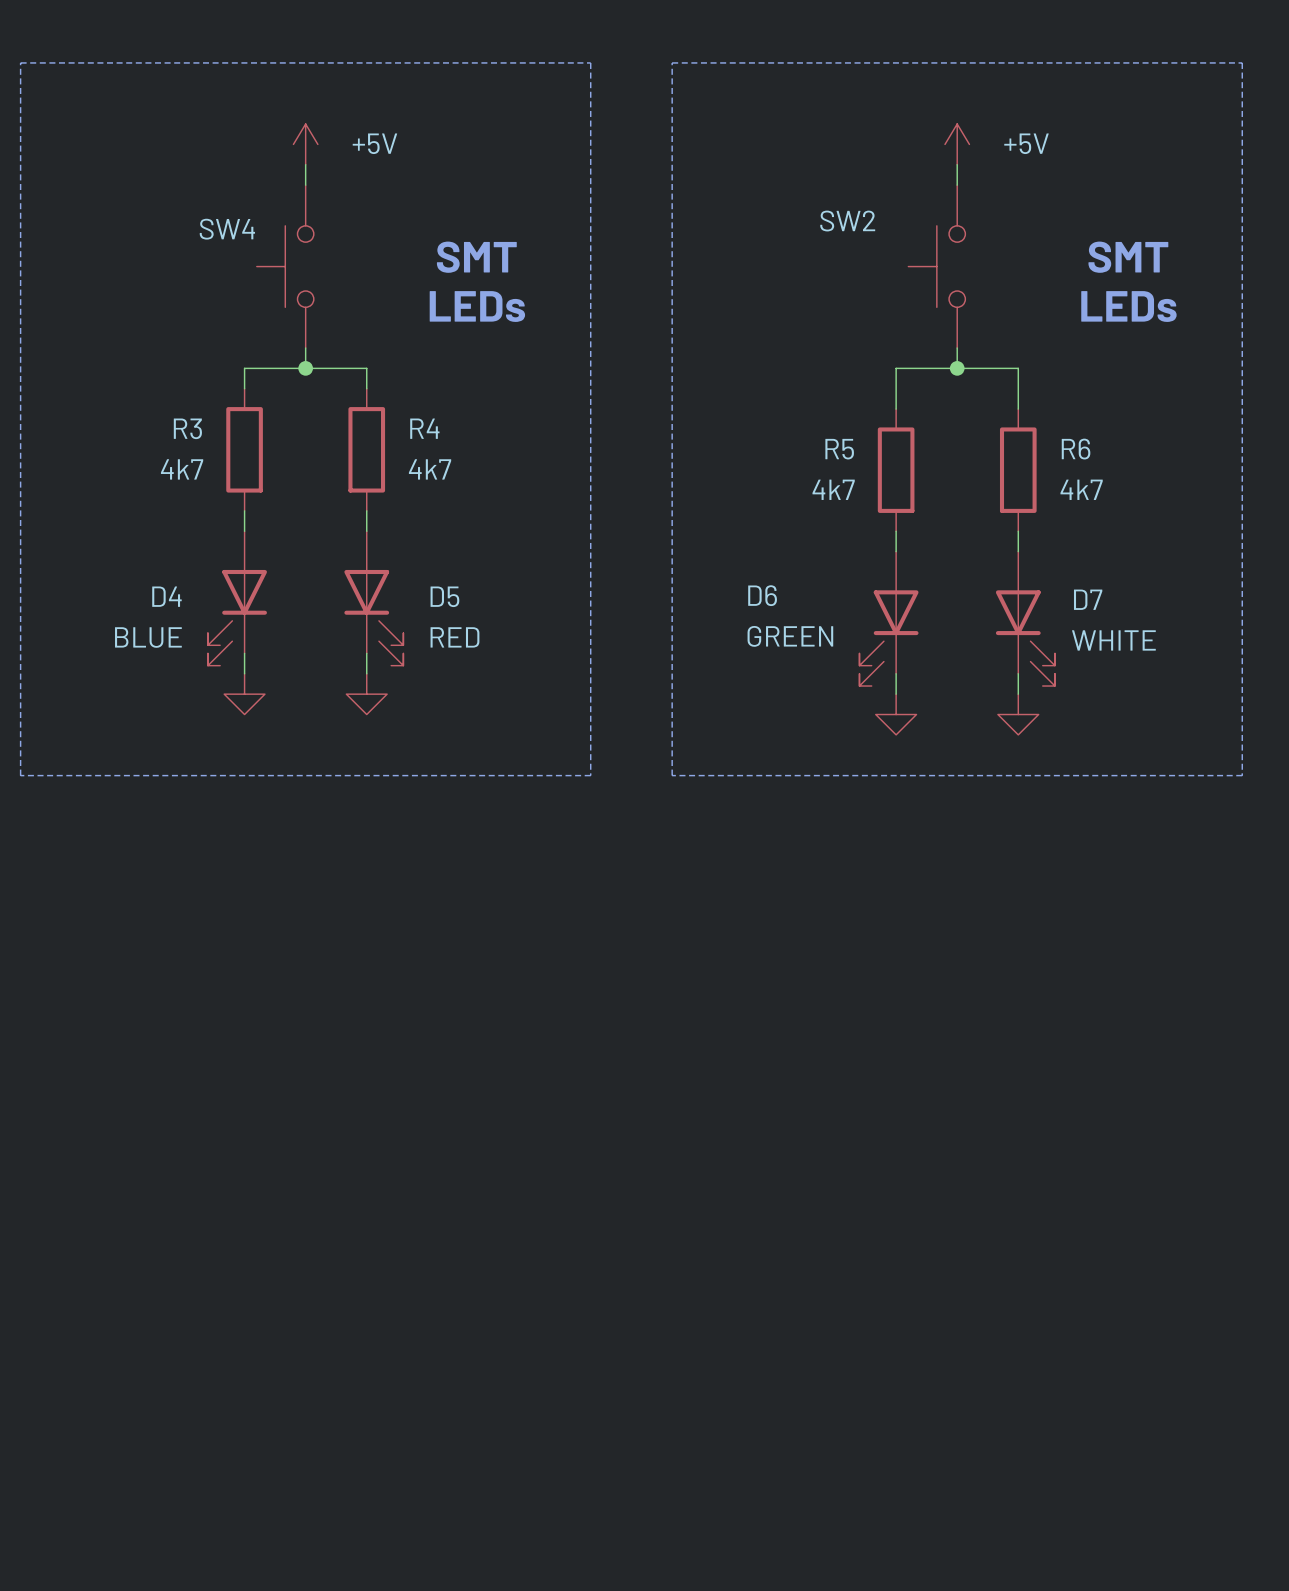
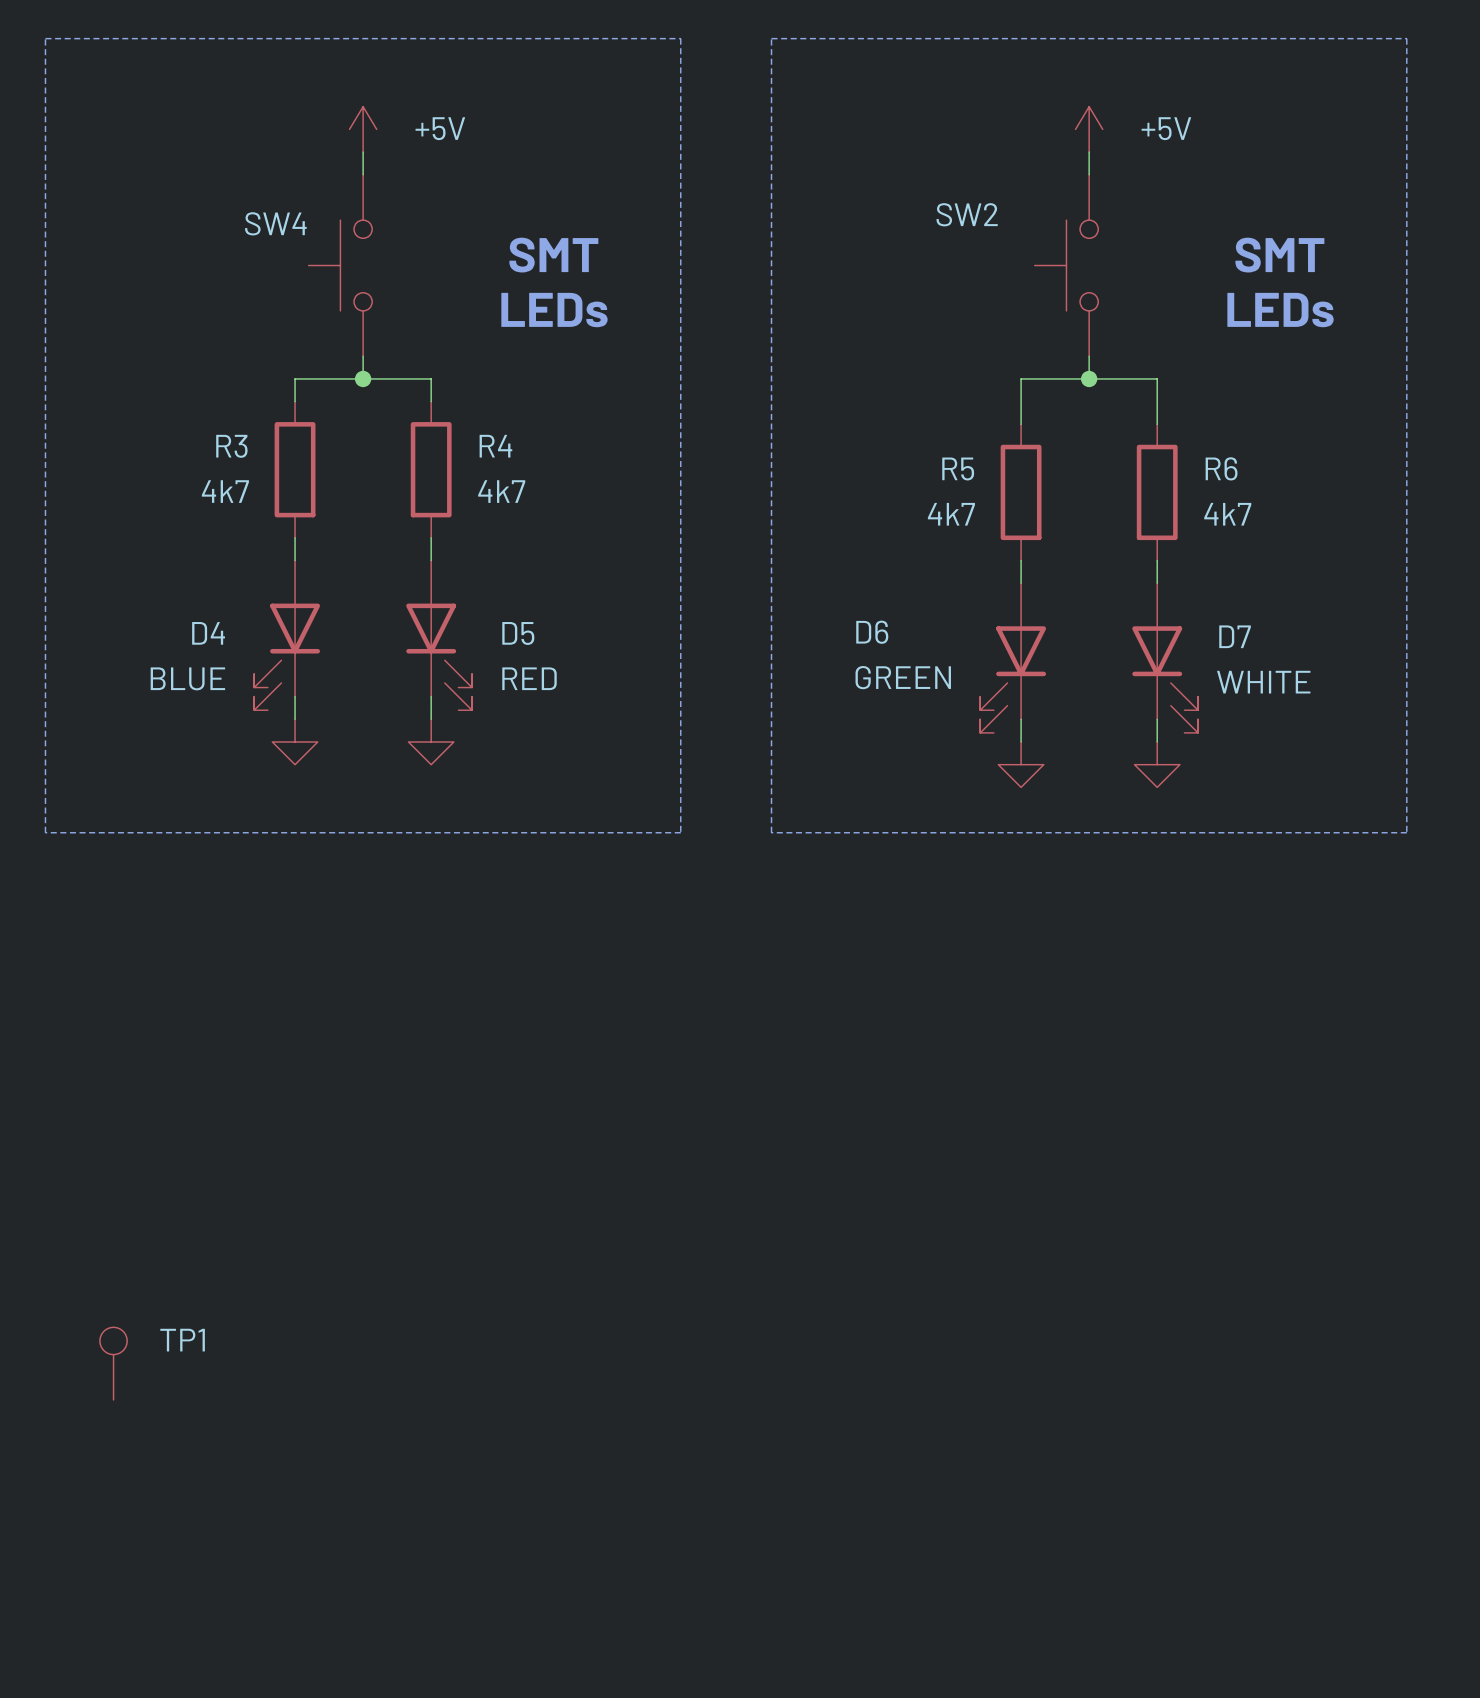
TP1: none -> (113, 1363)

